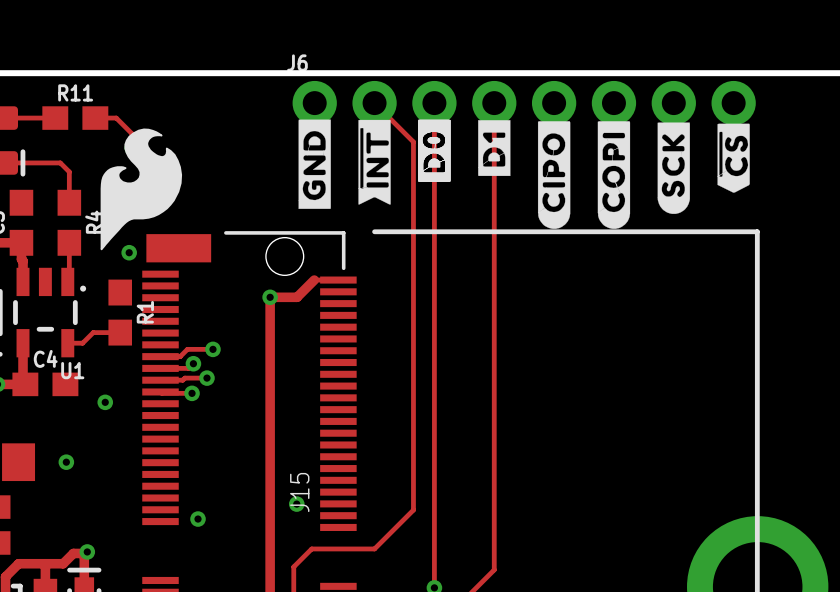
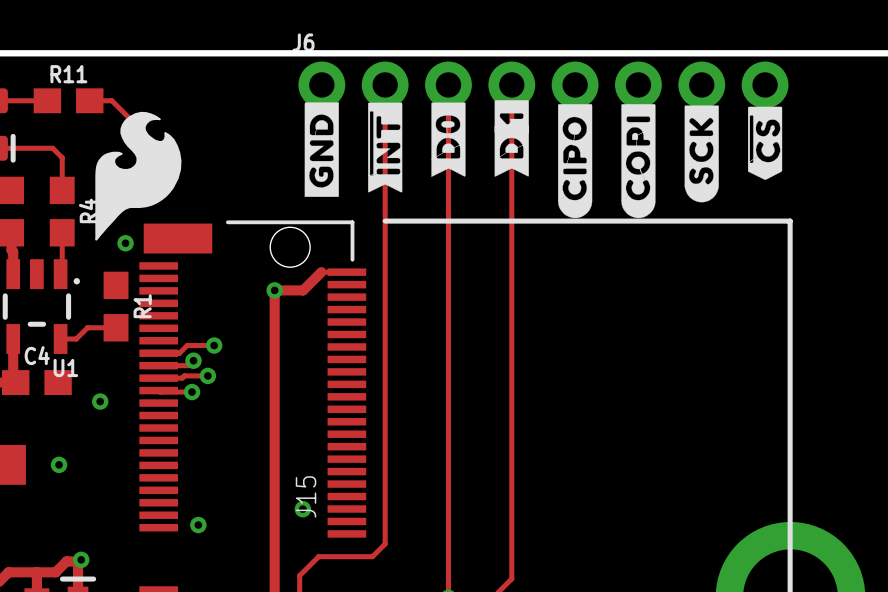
track: (374, 103) (413, 142) (413, 510) (374, 548) (362, 548) -> (385, 84) (385, 544) (372, 556)
drawing: none -> [494, 100, 529, 177]
drawing shape: [418, 119, 451, 182] -> [431, 102, 466, 177]
drawing: [478, 120, 511, 177] -> none

